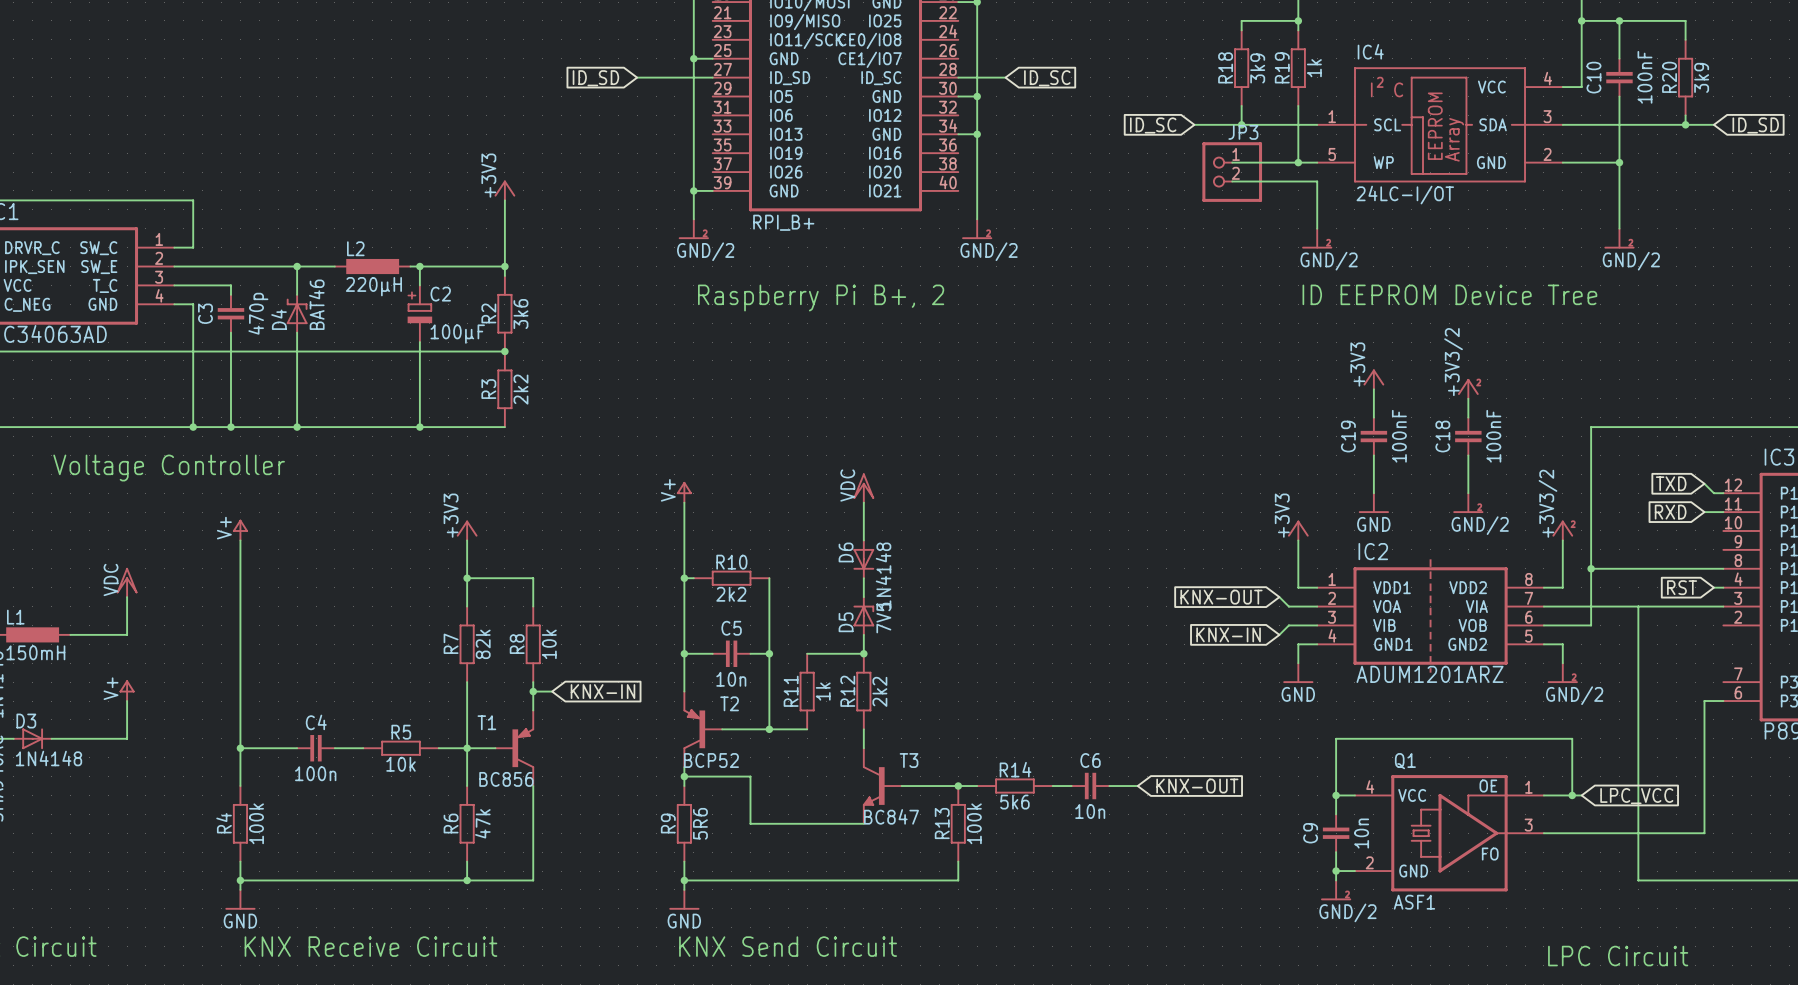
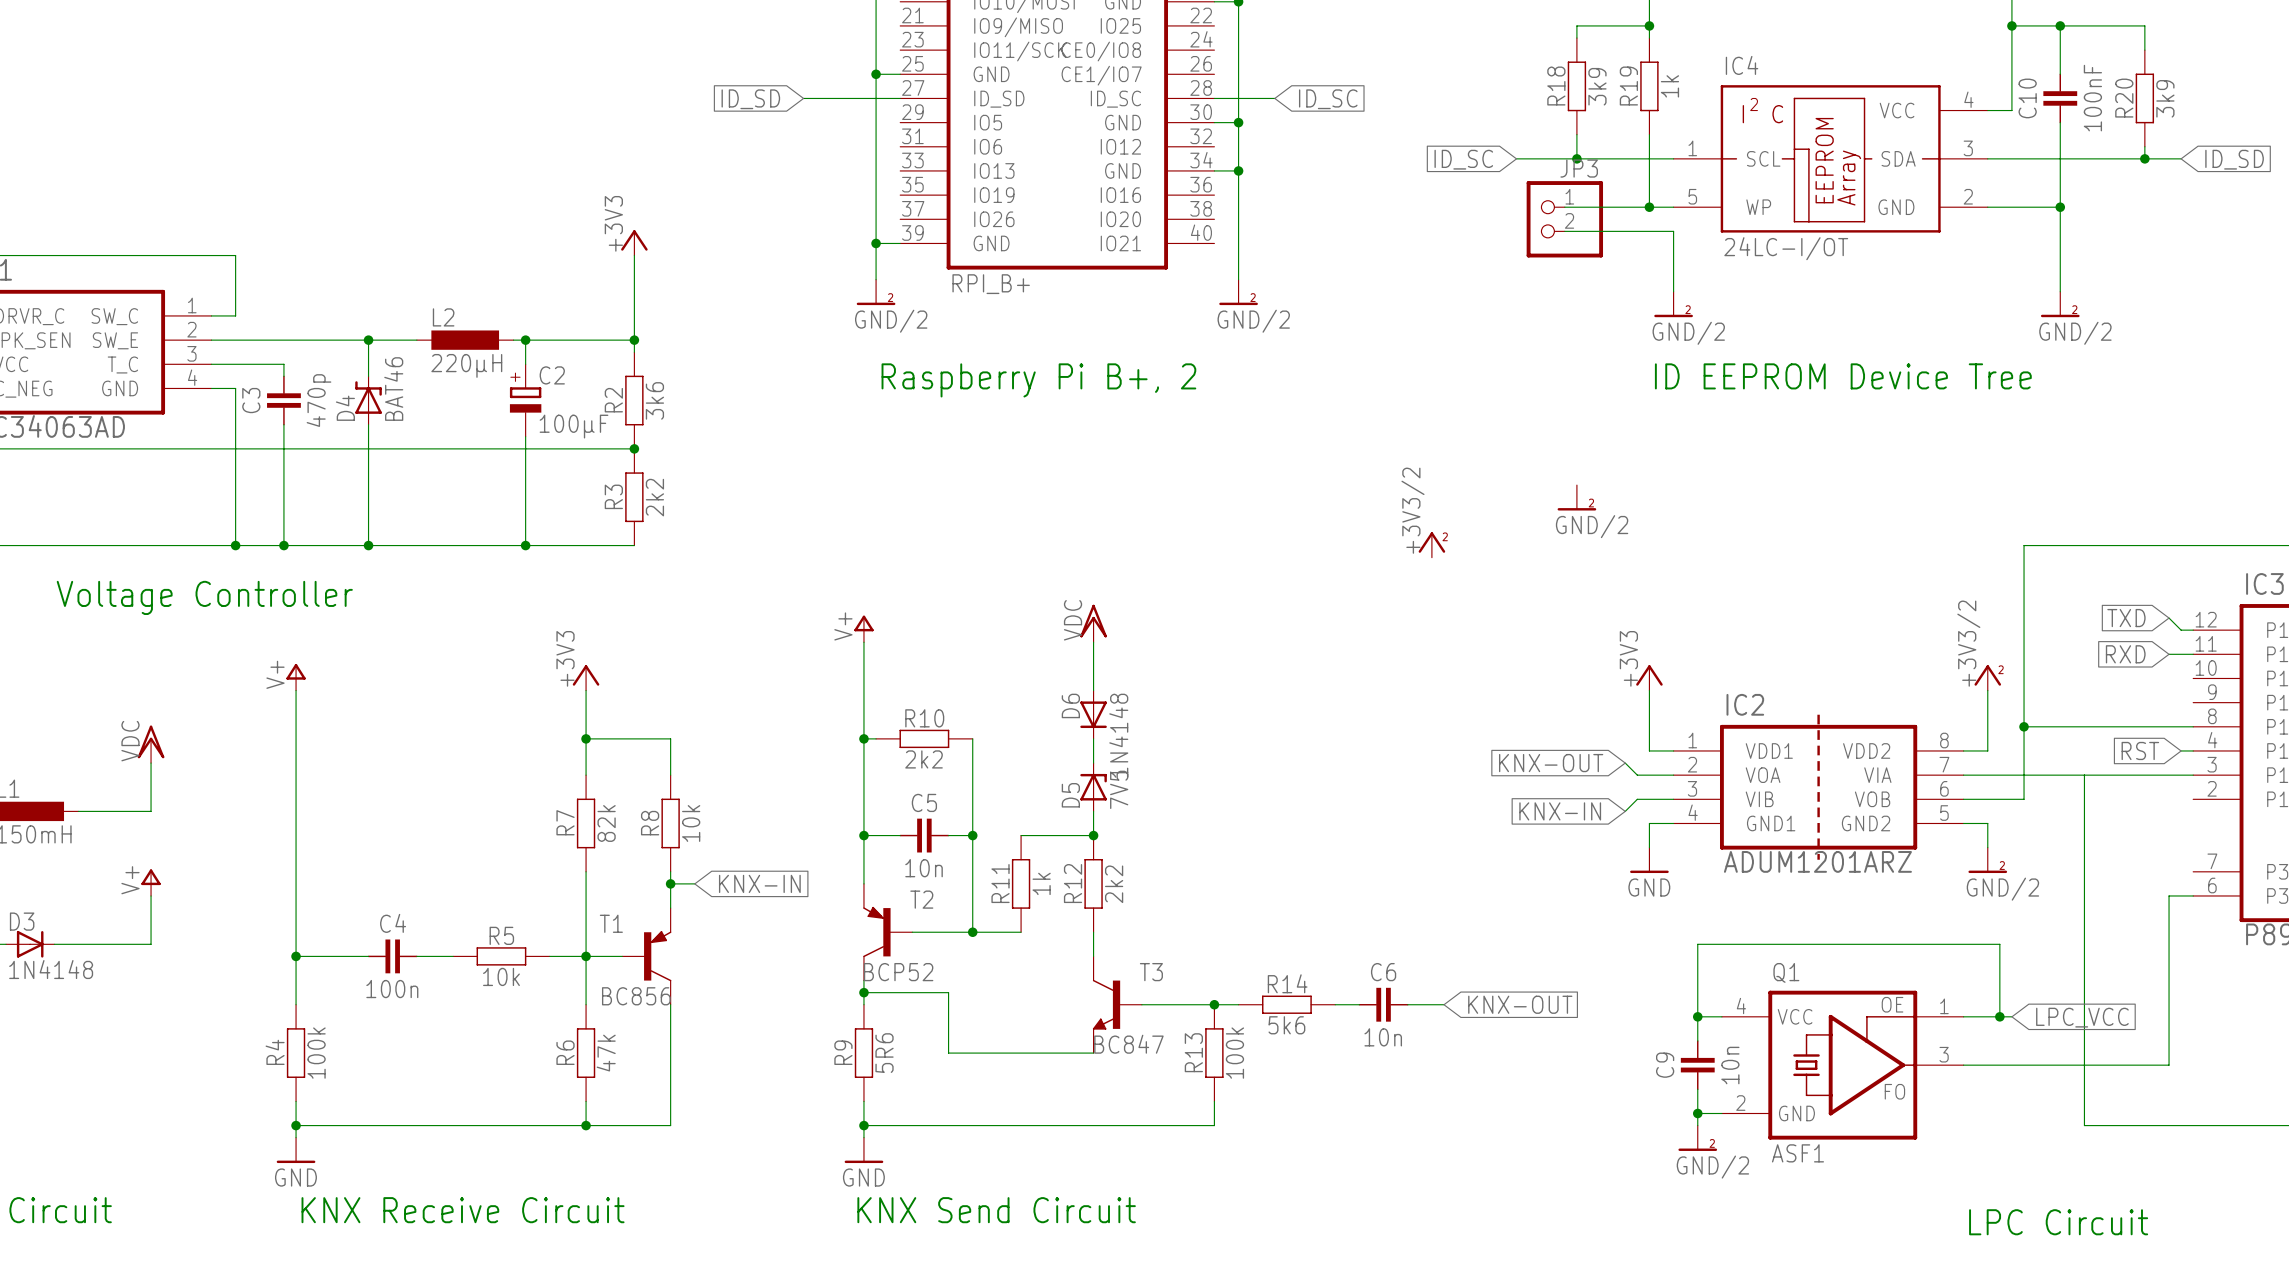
power symbol: +3V3 (1373, 379) -> none
power symbol: +3V3/2 (1468, 388) -> none
power symbol: none -> GND/2 (1576, 497)
wire: (1373, 389) (1373, 417) -> none
wire: (1468, 398) (1468, 417) -> none
power symbol: none -> +3V3/2 (1431, 544)
C19: 100nF (1373, 436) -> none
C18: 100nF (1468, 436) -> none
wire: (1373, 455) (1373, 493) -> none
wire: (1468, 455) (1468, 493) -> none
power symbol: GND (1373, 503) -> none
power symbol: GND/2 (1468, 503) -> none

